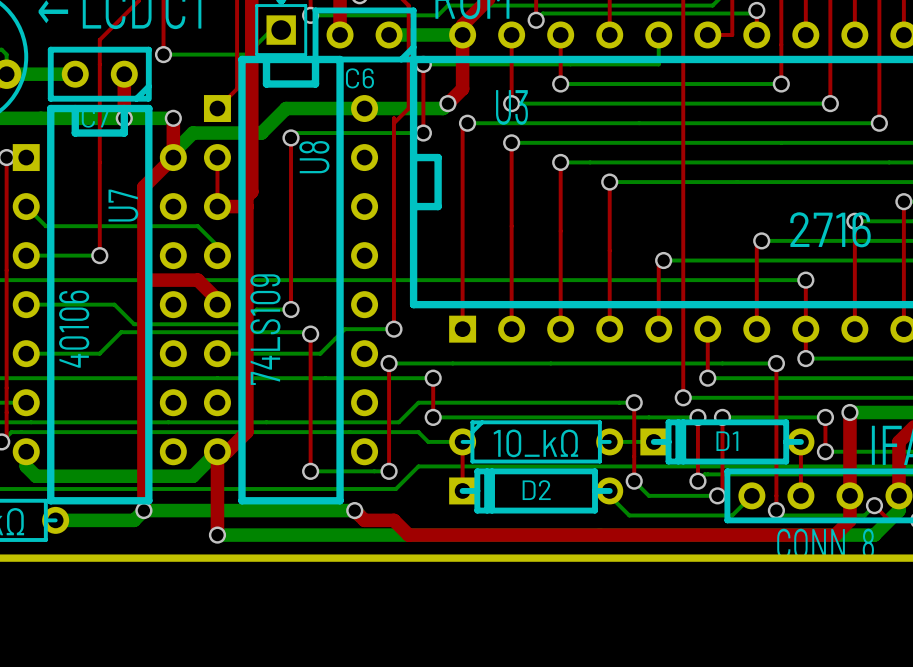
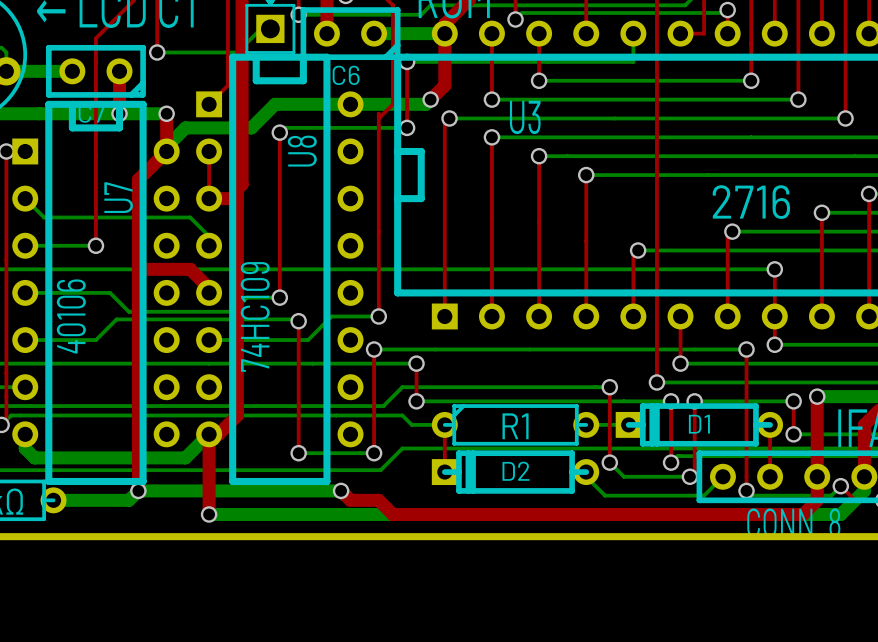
U3 name position: U3 (511, 107) -> U3 (525, 117)
U3 value position: 2716 (830, 229) -> 2716 (751, 202)
U8 value: 74LS109 (265, 329) -> 74HC109 (255, 316)
R1 value: 10_kΩ (535, 443) -> none
R1 name: none -> R1 (515, 426)

